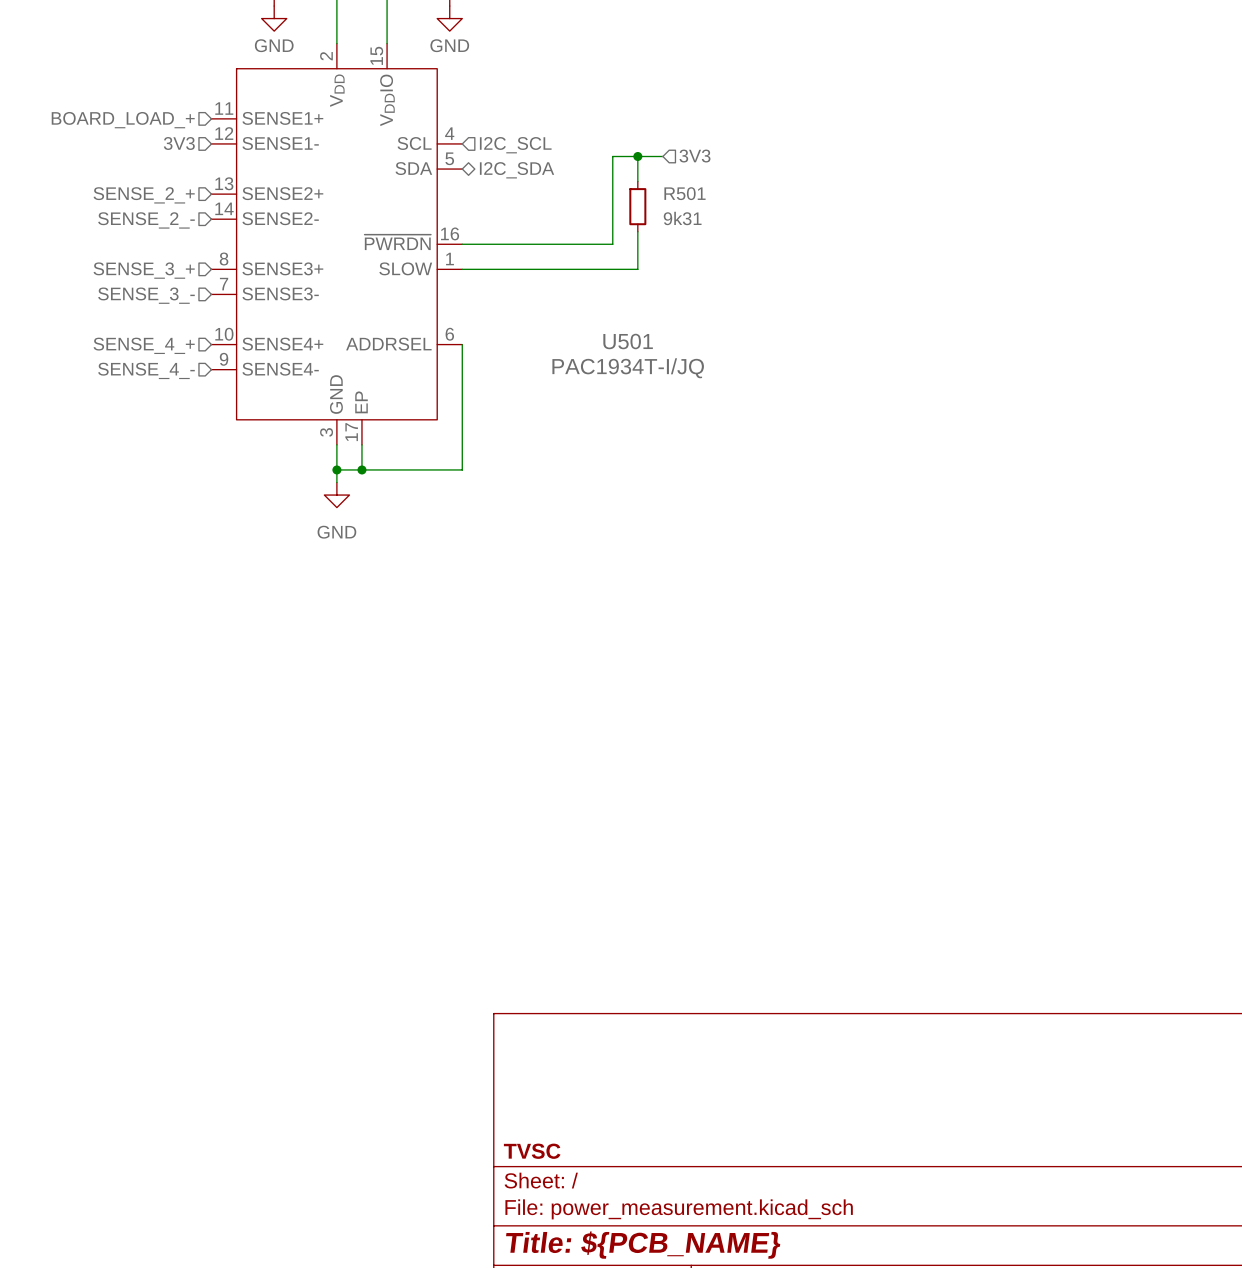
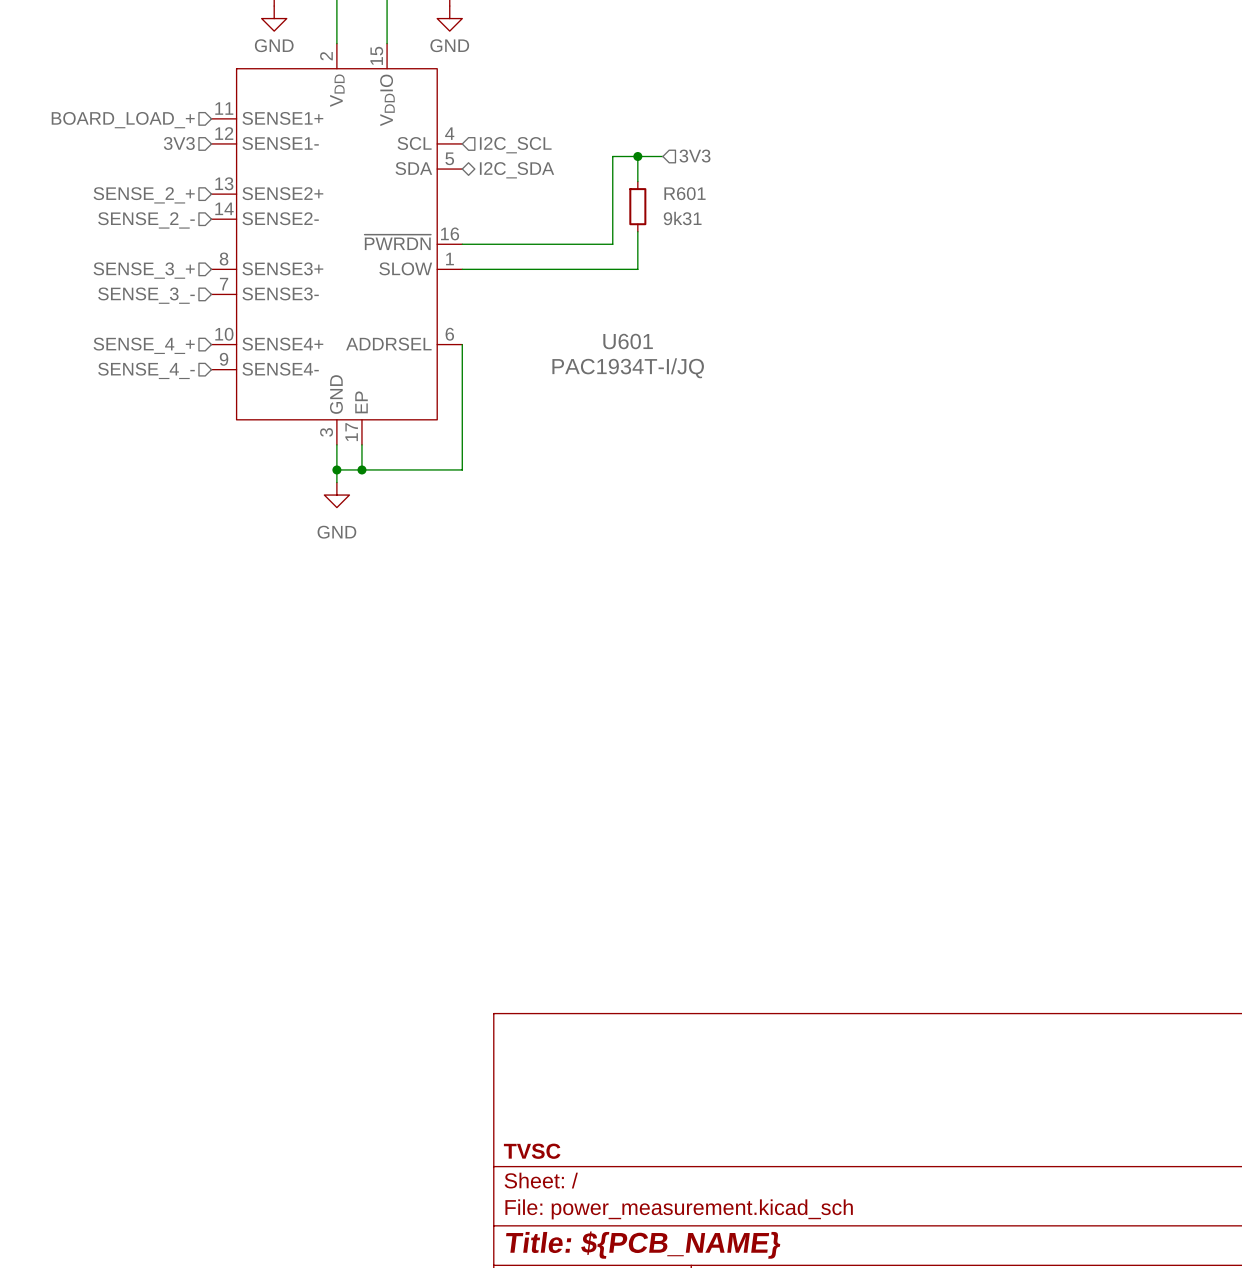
R501 name: R501 (685, 193) -> R601 (685, 193)
U501 name: U501 (628, 341) -> U601 (628, 341)

